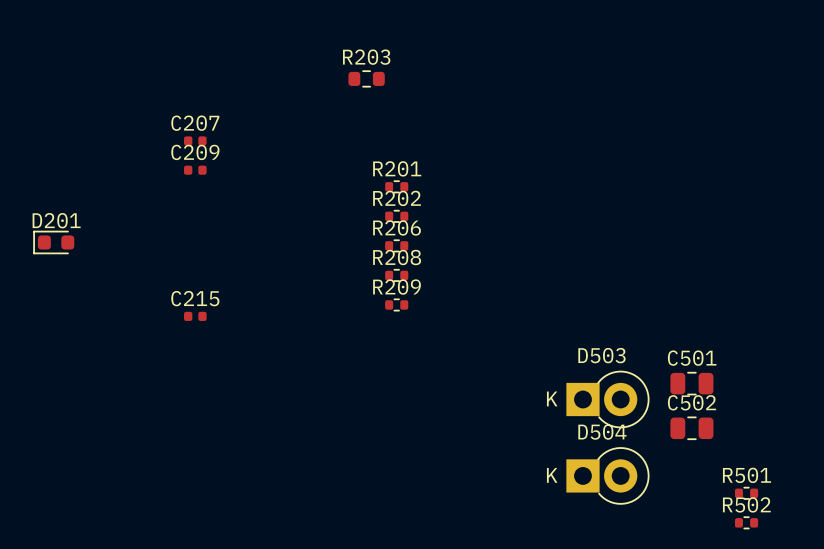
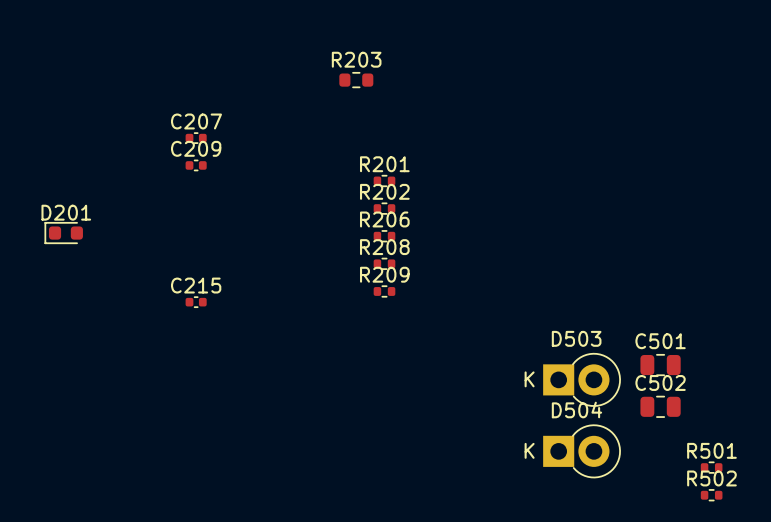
C207 footprint: [184, 136, 207, 146] -> [185, 132, 207, 144]
C209 footprint: [184, 165, 207, 175] -> [185, 159, 207, 172]
C215 footprint: [184, 311, 207, 321] -> [185, 296, 207, 308]

